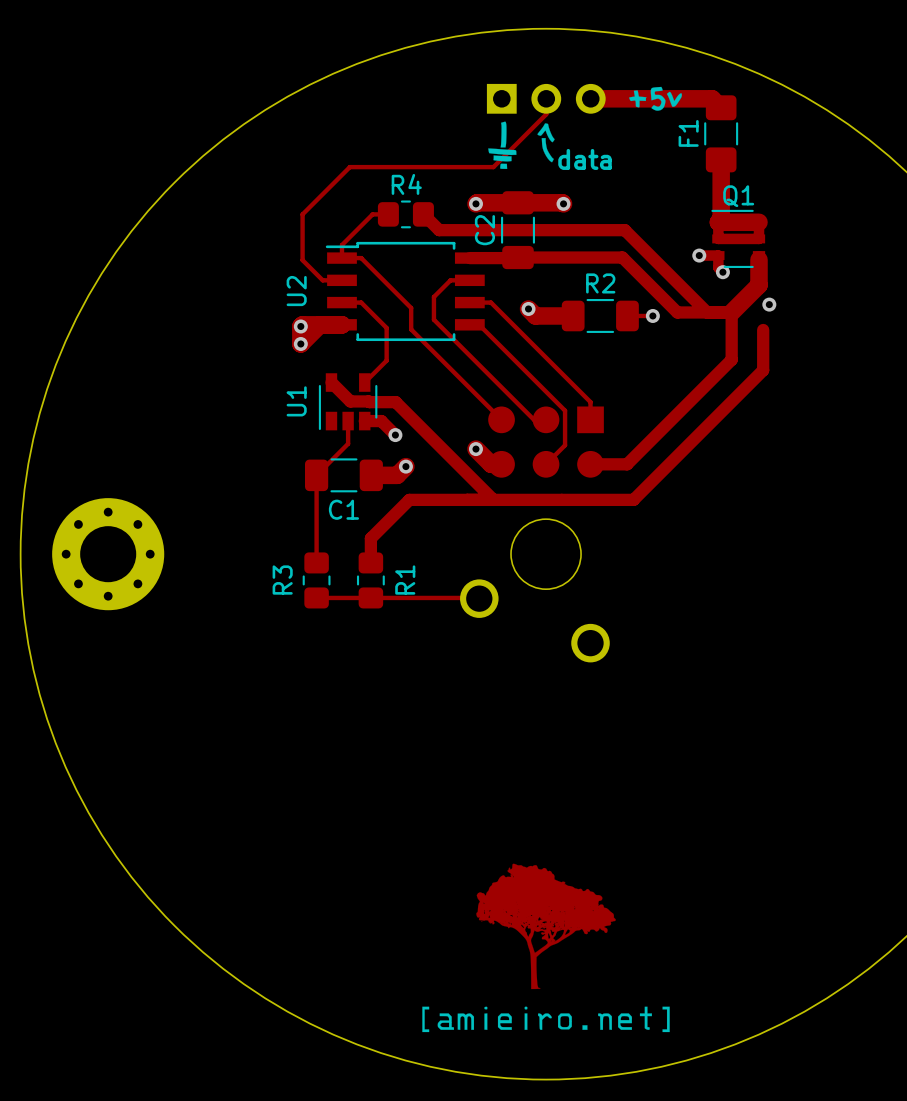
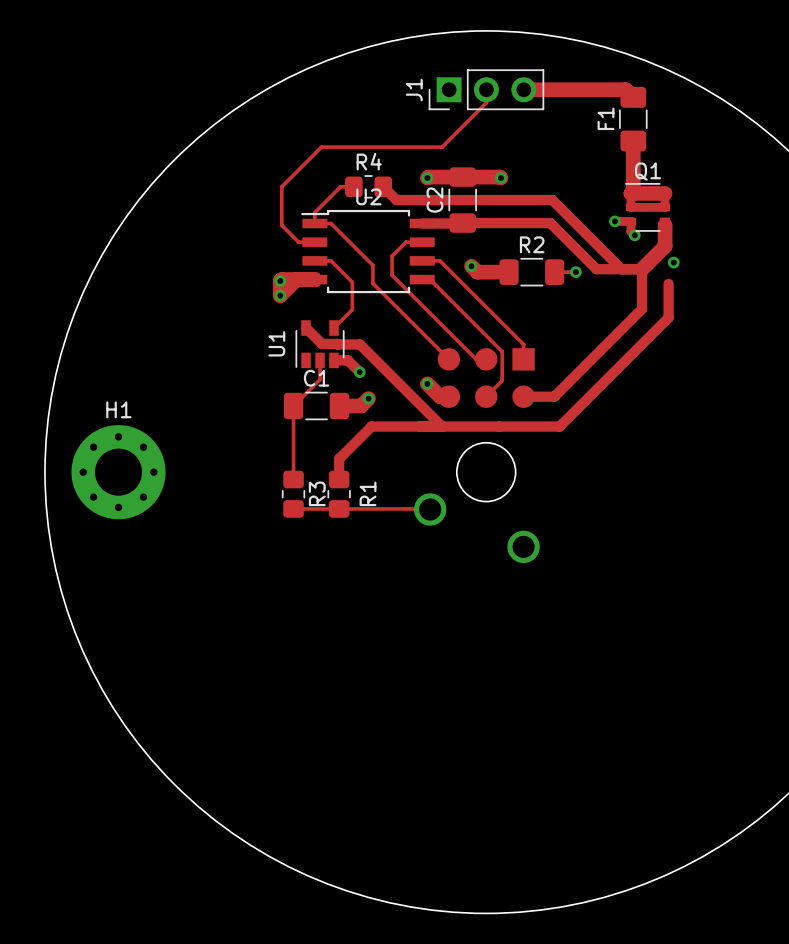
drawing: [629, 86, 682, 111] -> none
J1: none -> (486, 89)
drawing: [488, 121, 517, 170] -> none
drawing: [537, 123, 555, 163] -> none
text: data (585, 159) -> none
U2 name rotation: 0° (296, 291) -> 90° clockwise (368, 196)
U2 name position: U2 (296, 291) -> U2 (368, 196)
H1 name: none -> H1 (118, 409)
C1 name position: C1 (343, 509) -> C1 (316, 378)
R3 name position: R3 (282, 580) -> R3 (317, 493)
drawing: [422, 863, 670, 1033] -> none

